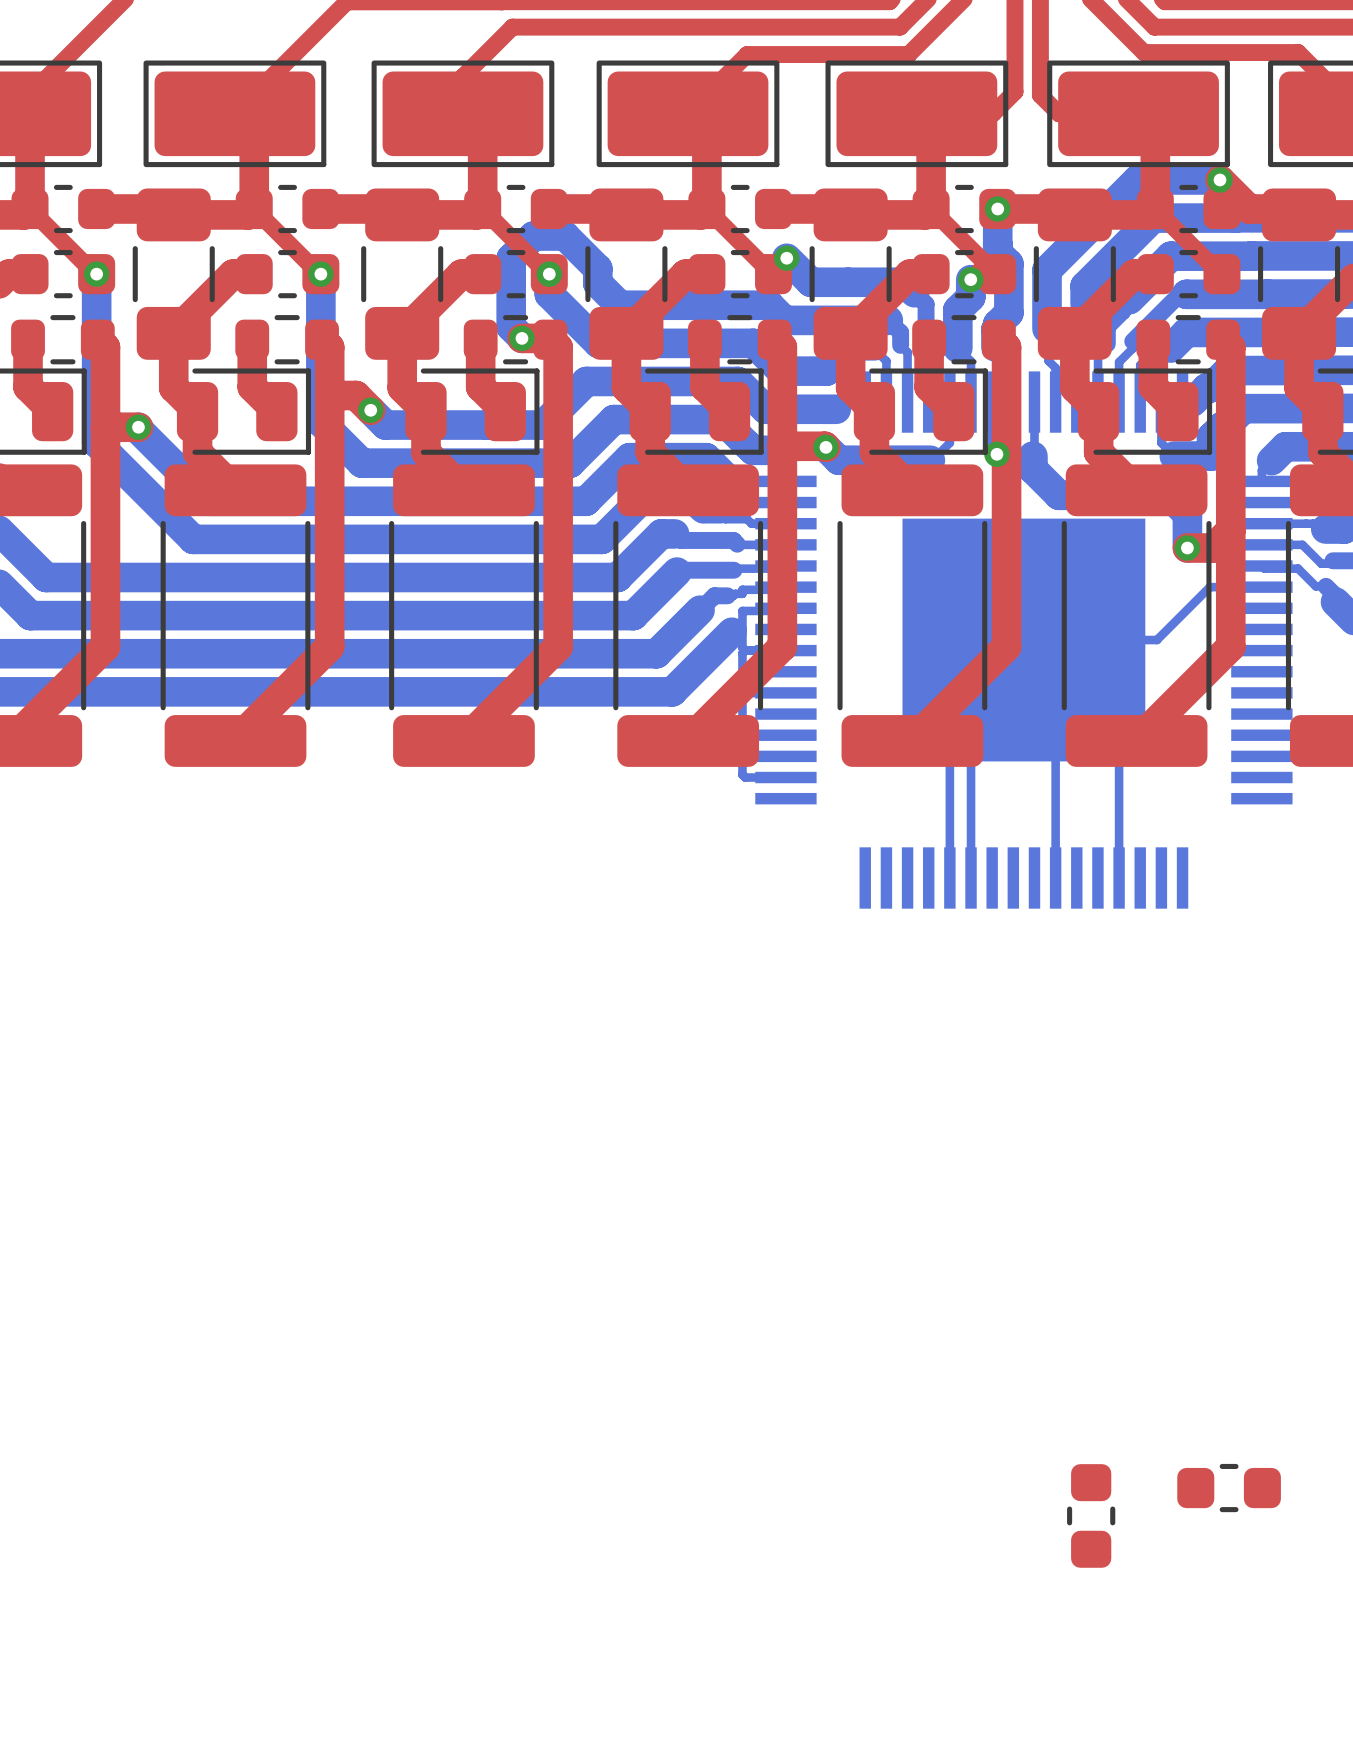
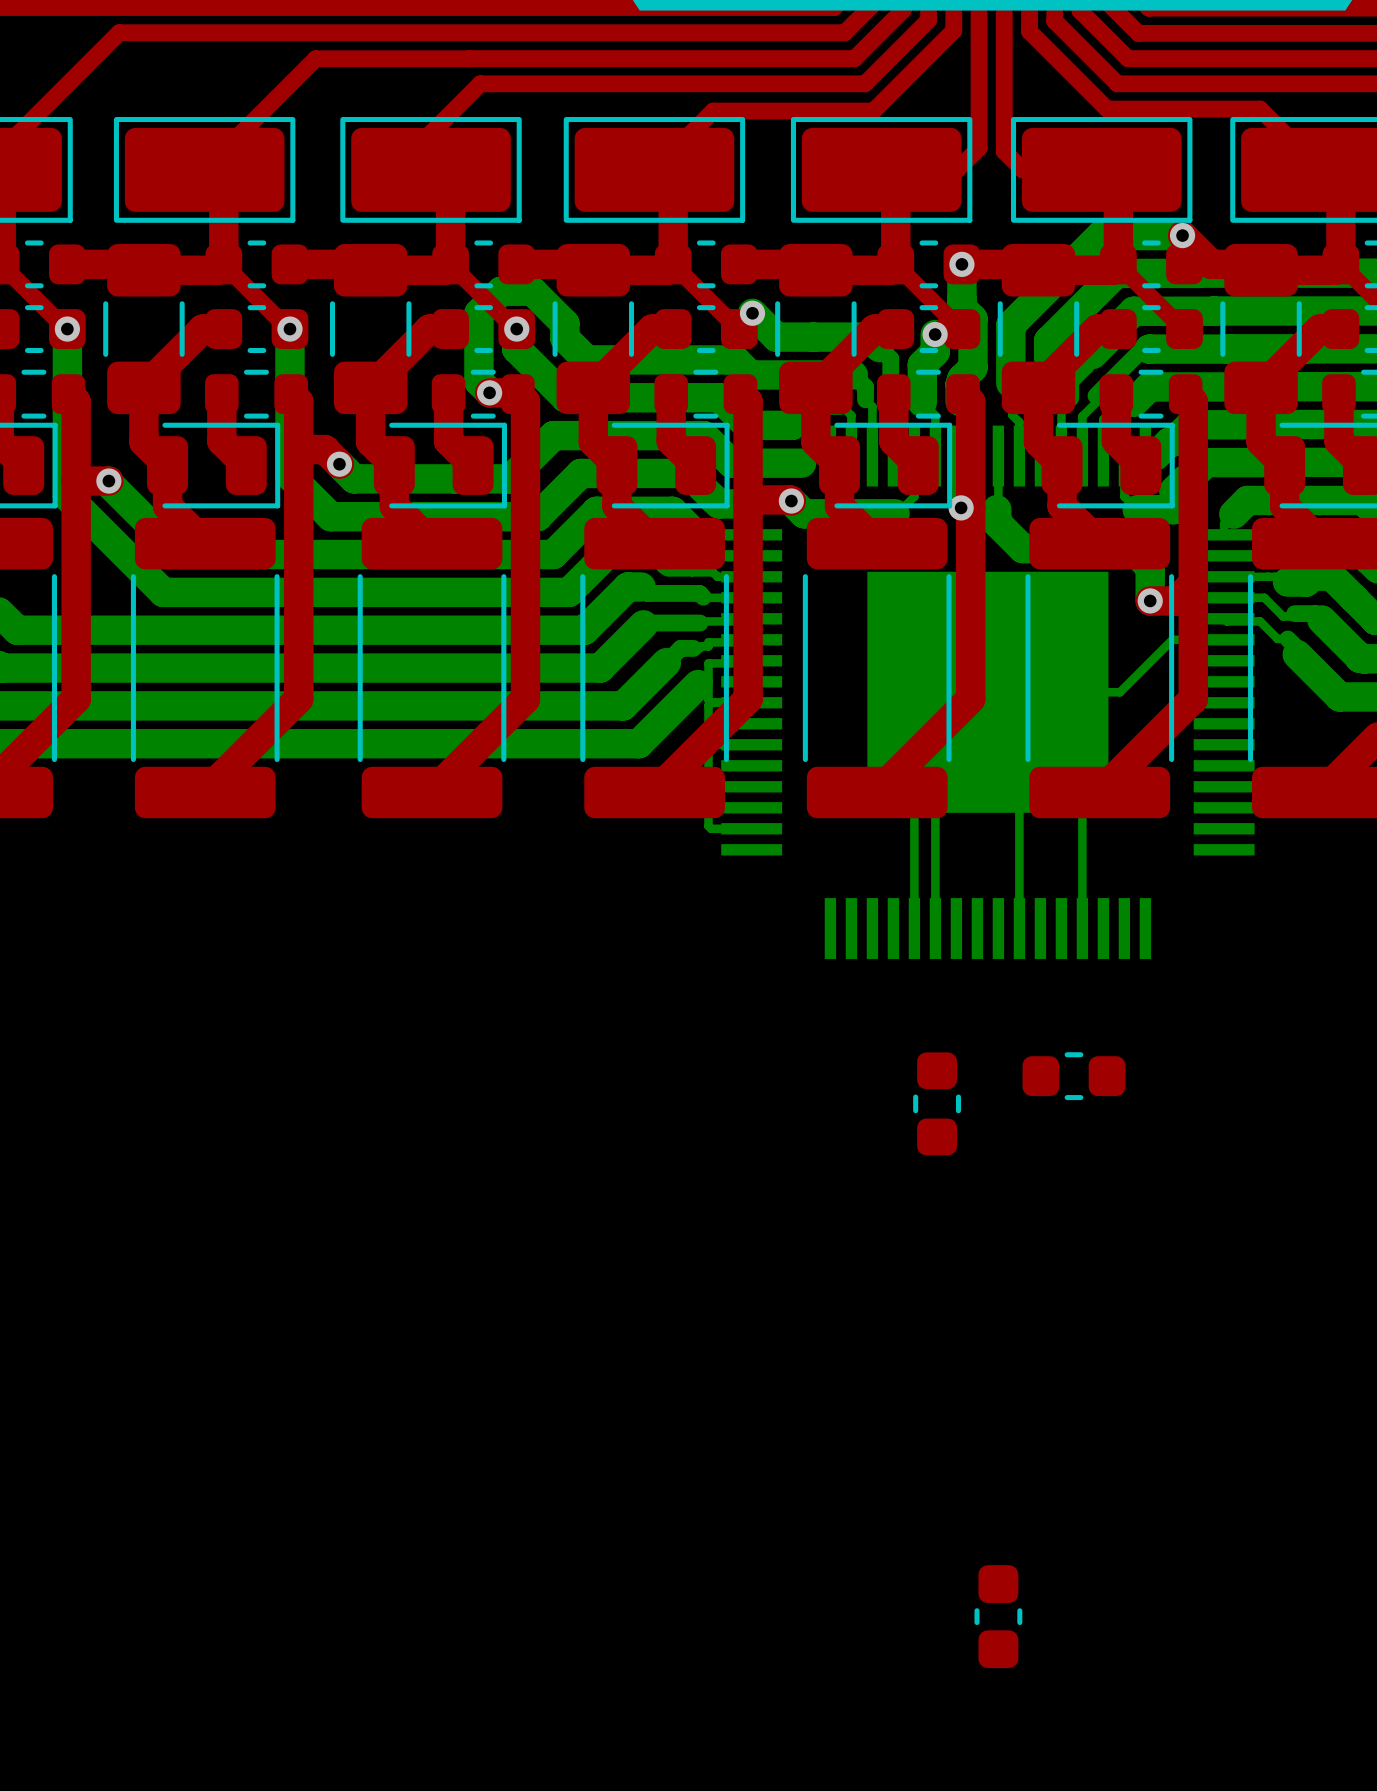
part: none -> (1073, 1076)
part: none -> (937, 1103)
part: (1229, 1488) -> none
part: (1091, 1515) -> none
part: none -> (998, 1616)

